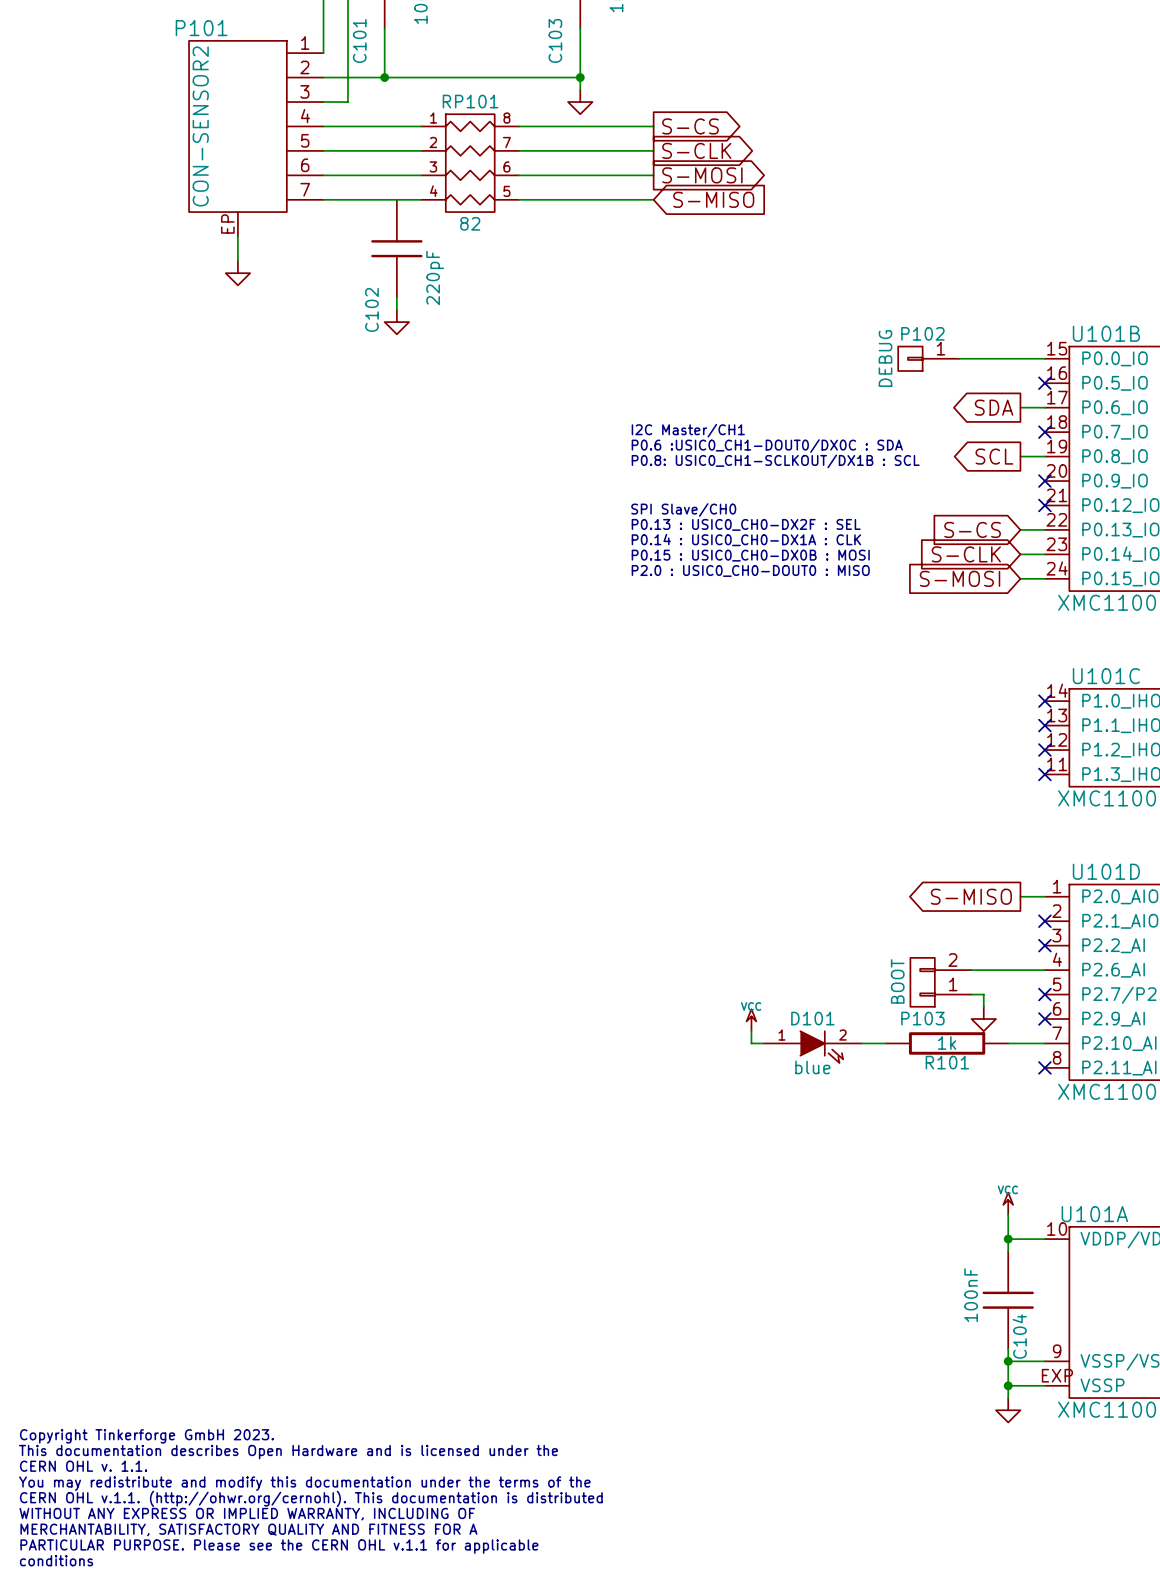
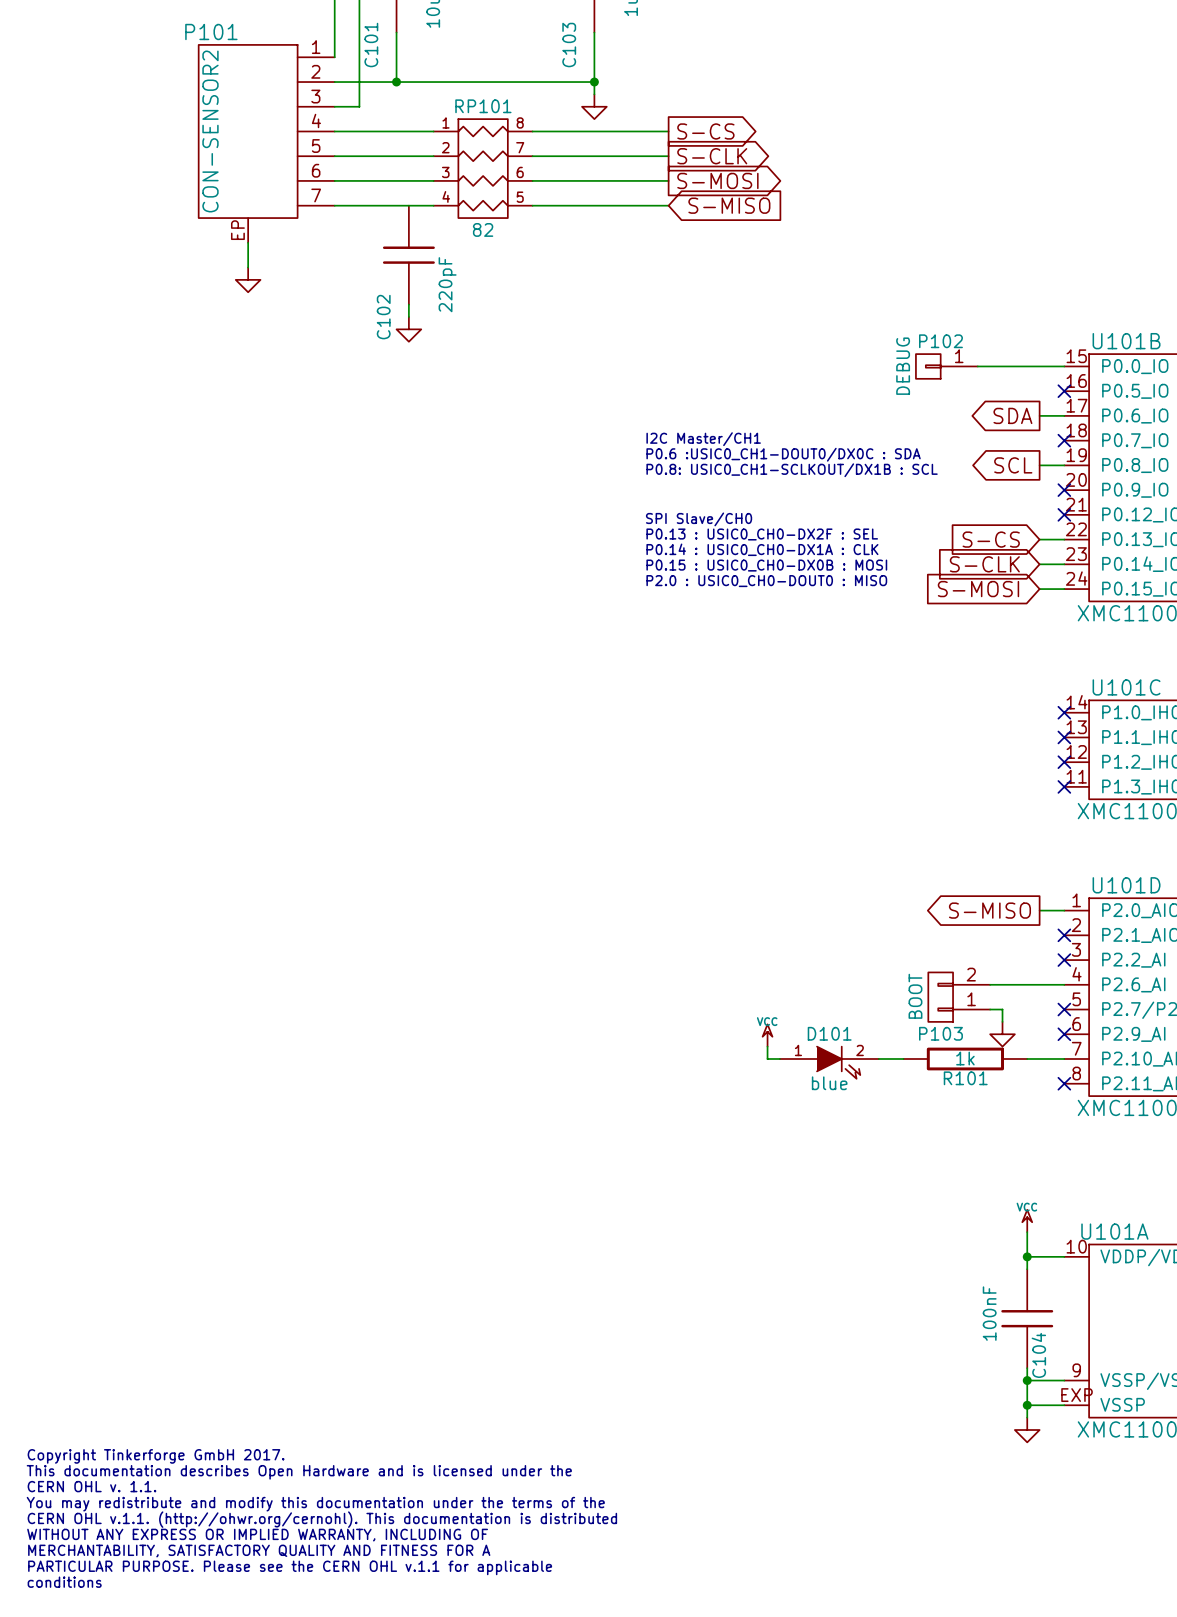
text: Copyright Tinkerforge GmbH 2023. (146, 1436) -> Copyright Tinkerforge GmbH 2017. (156, 1456)

